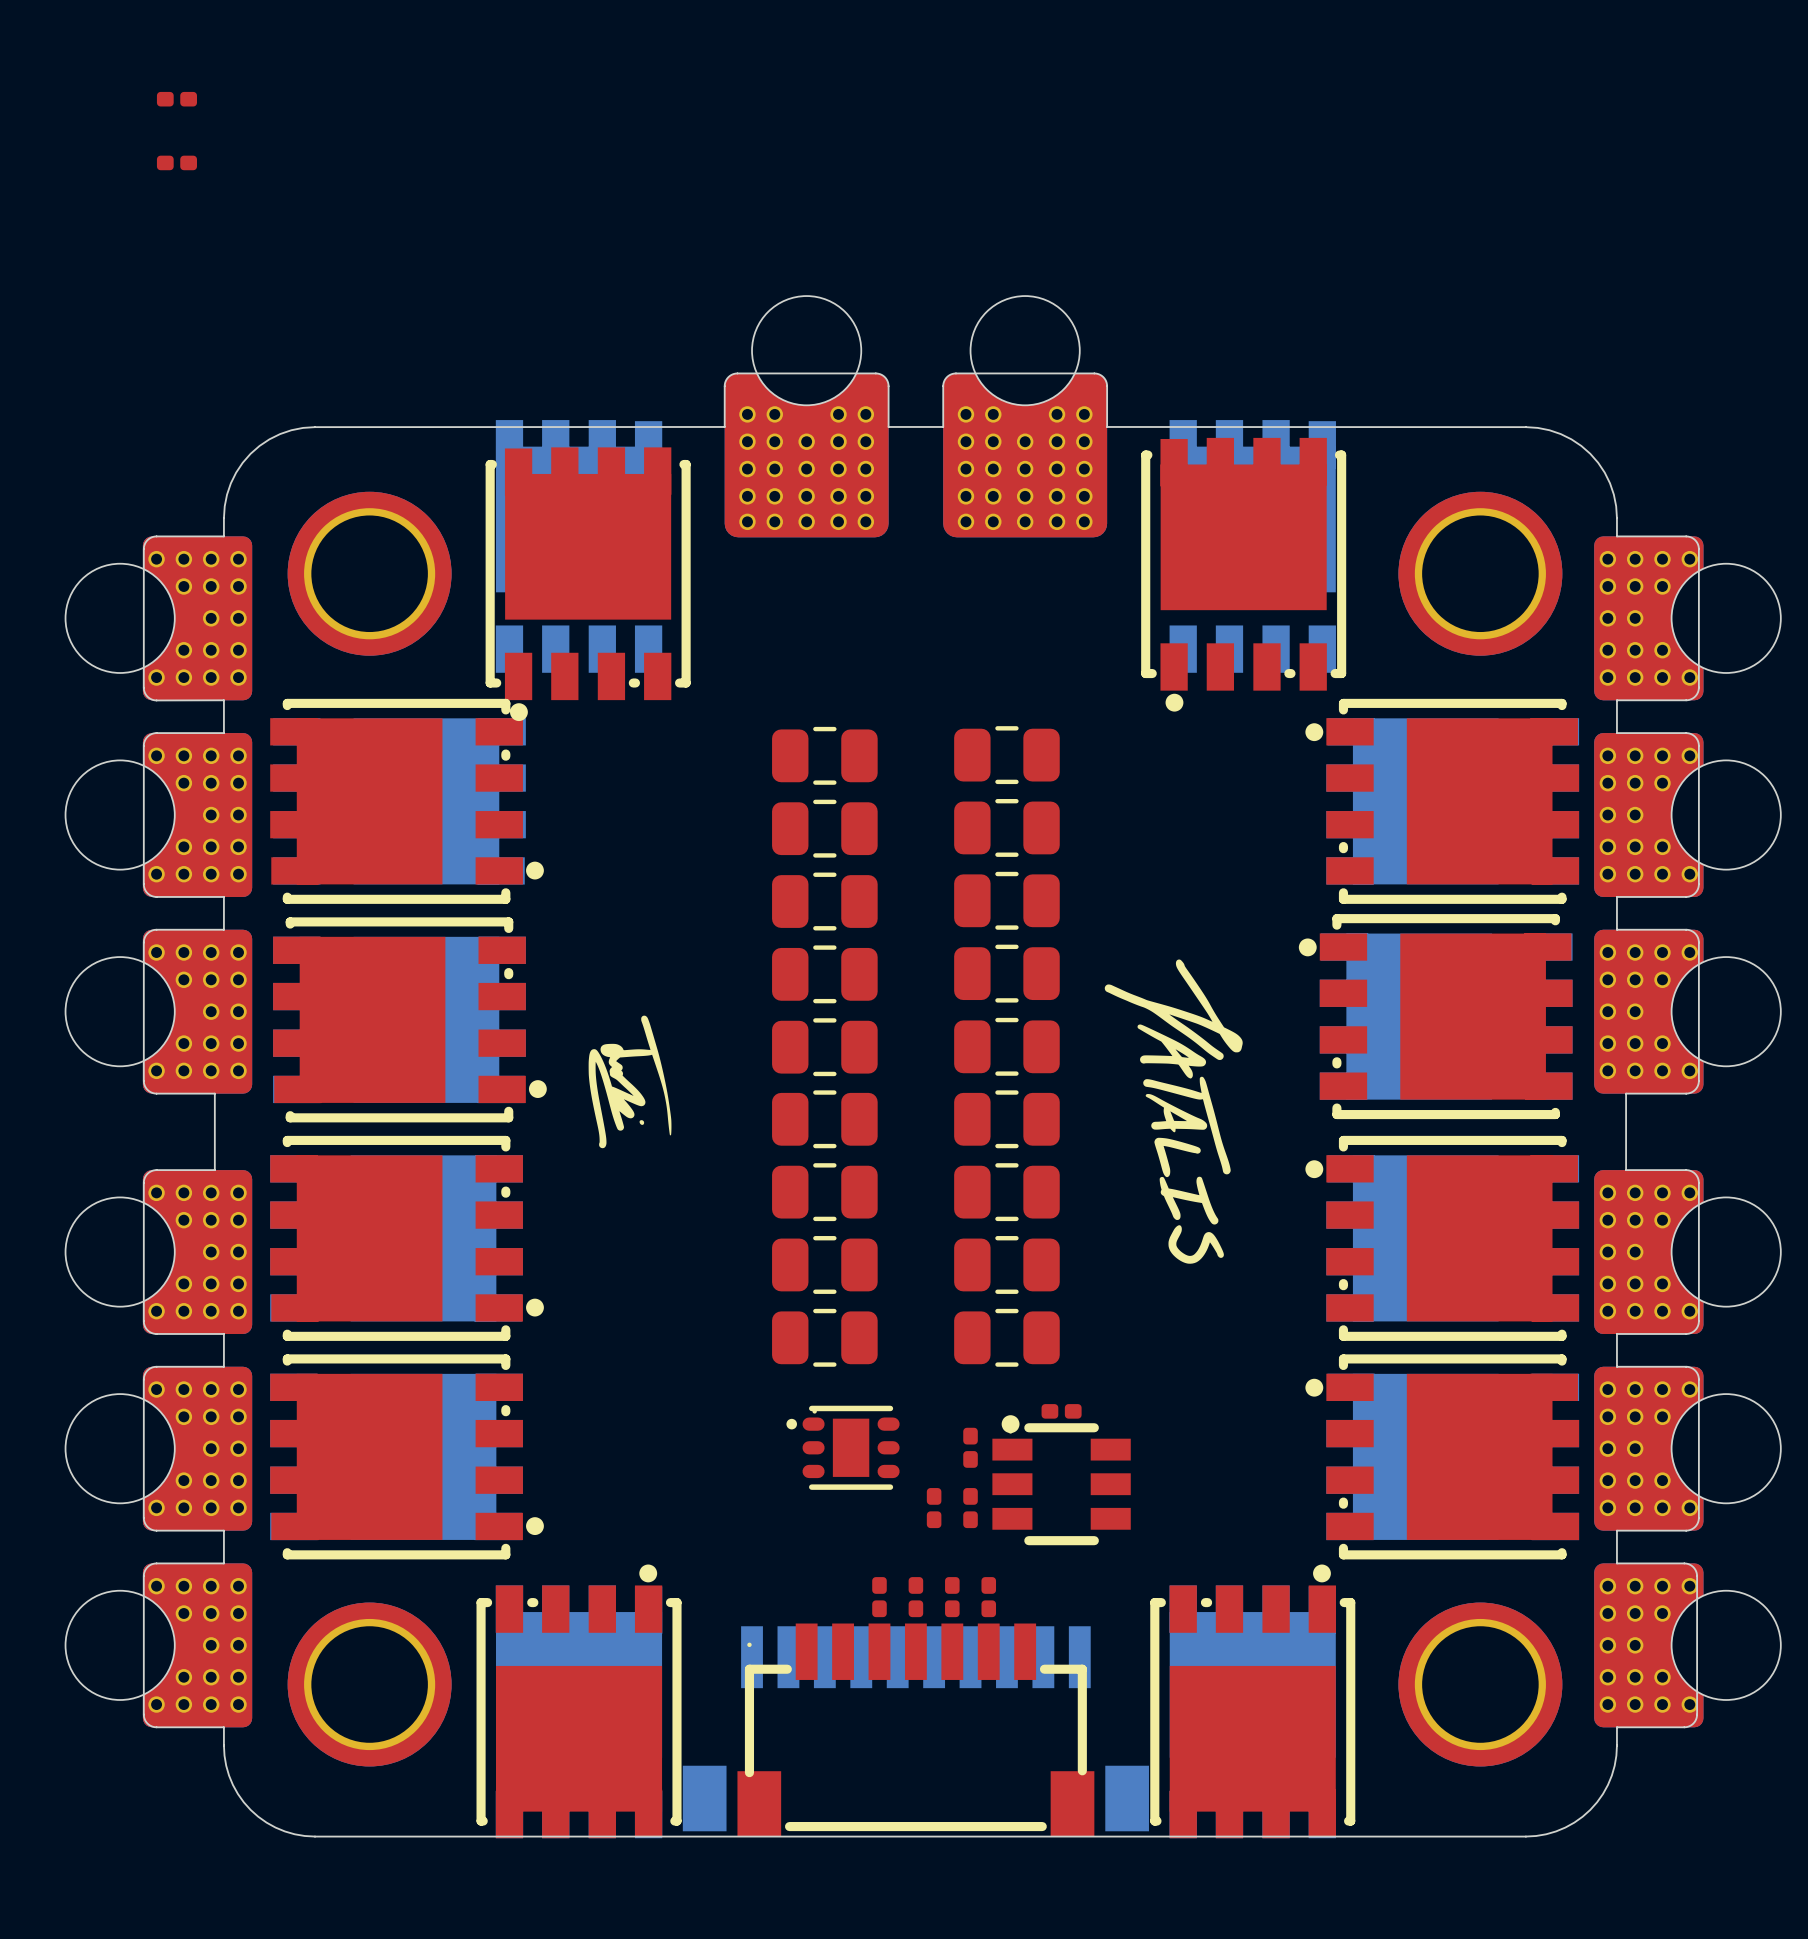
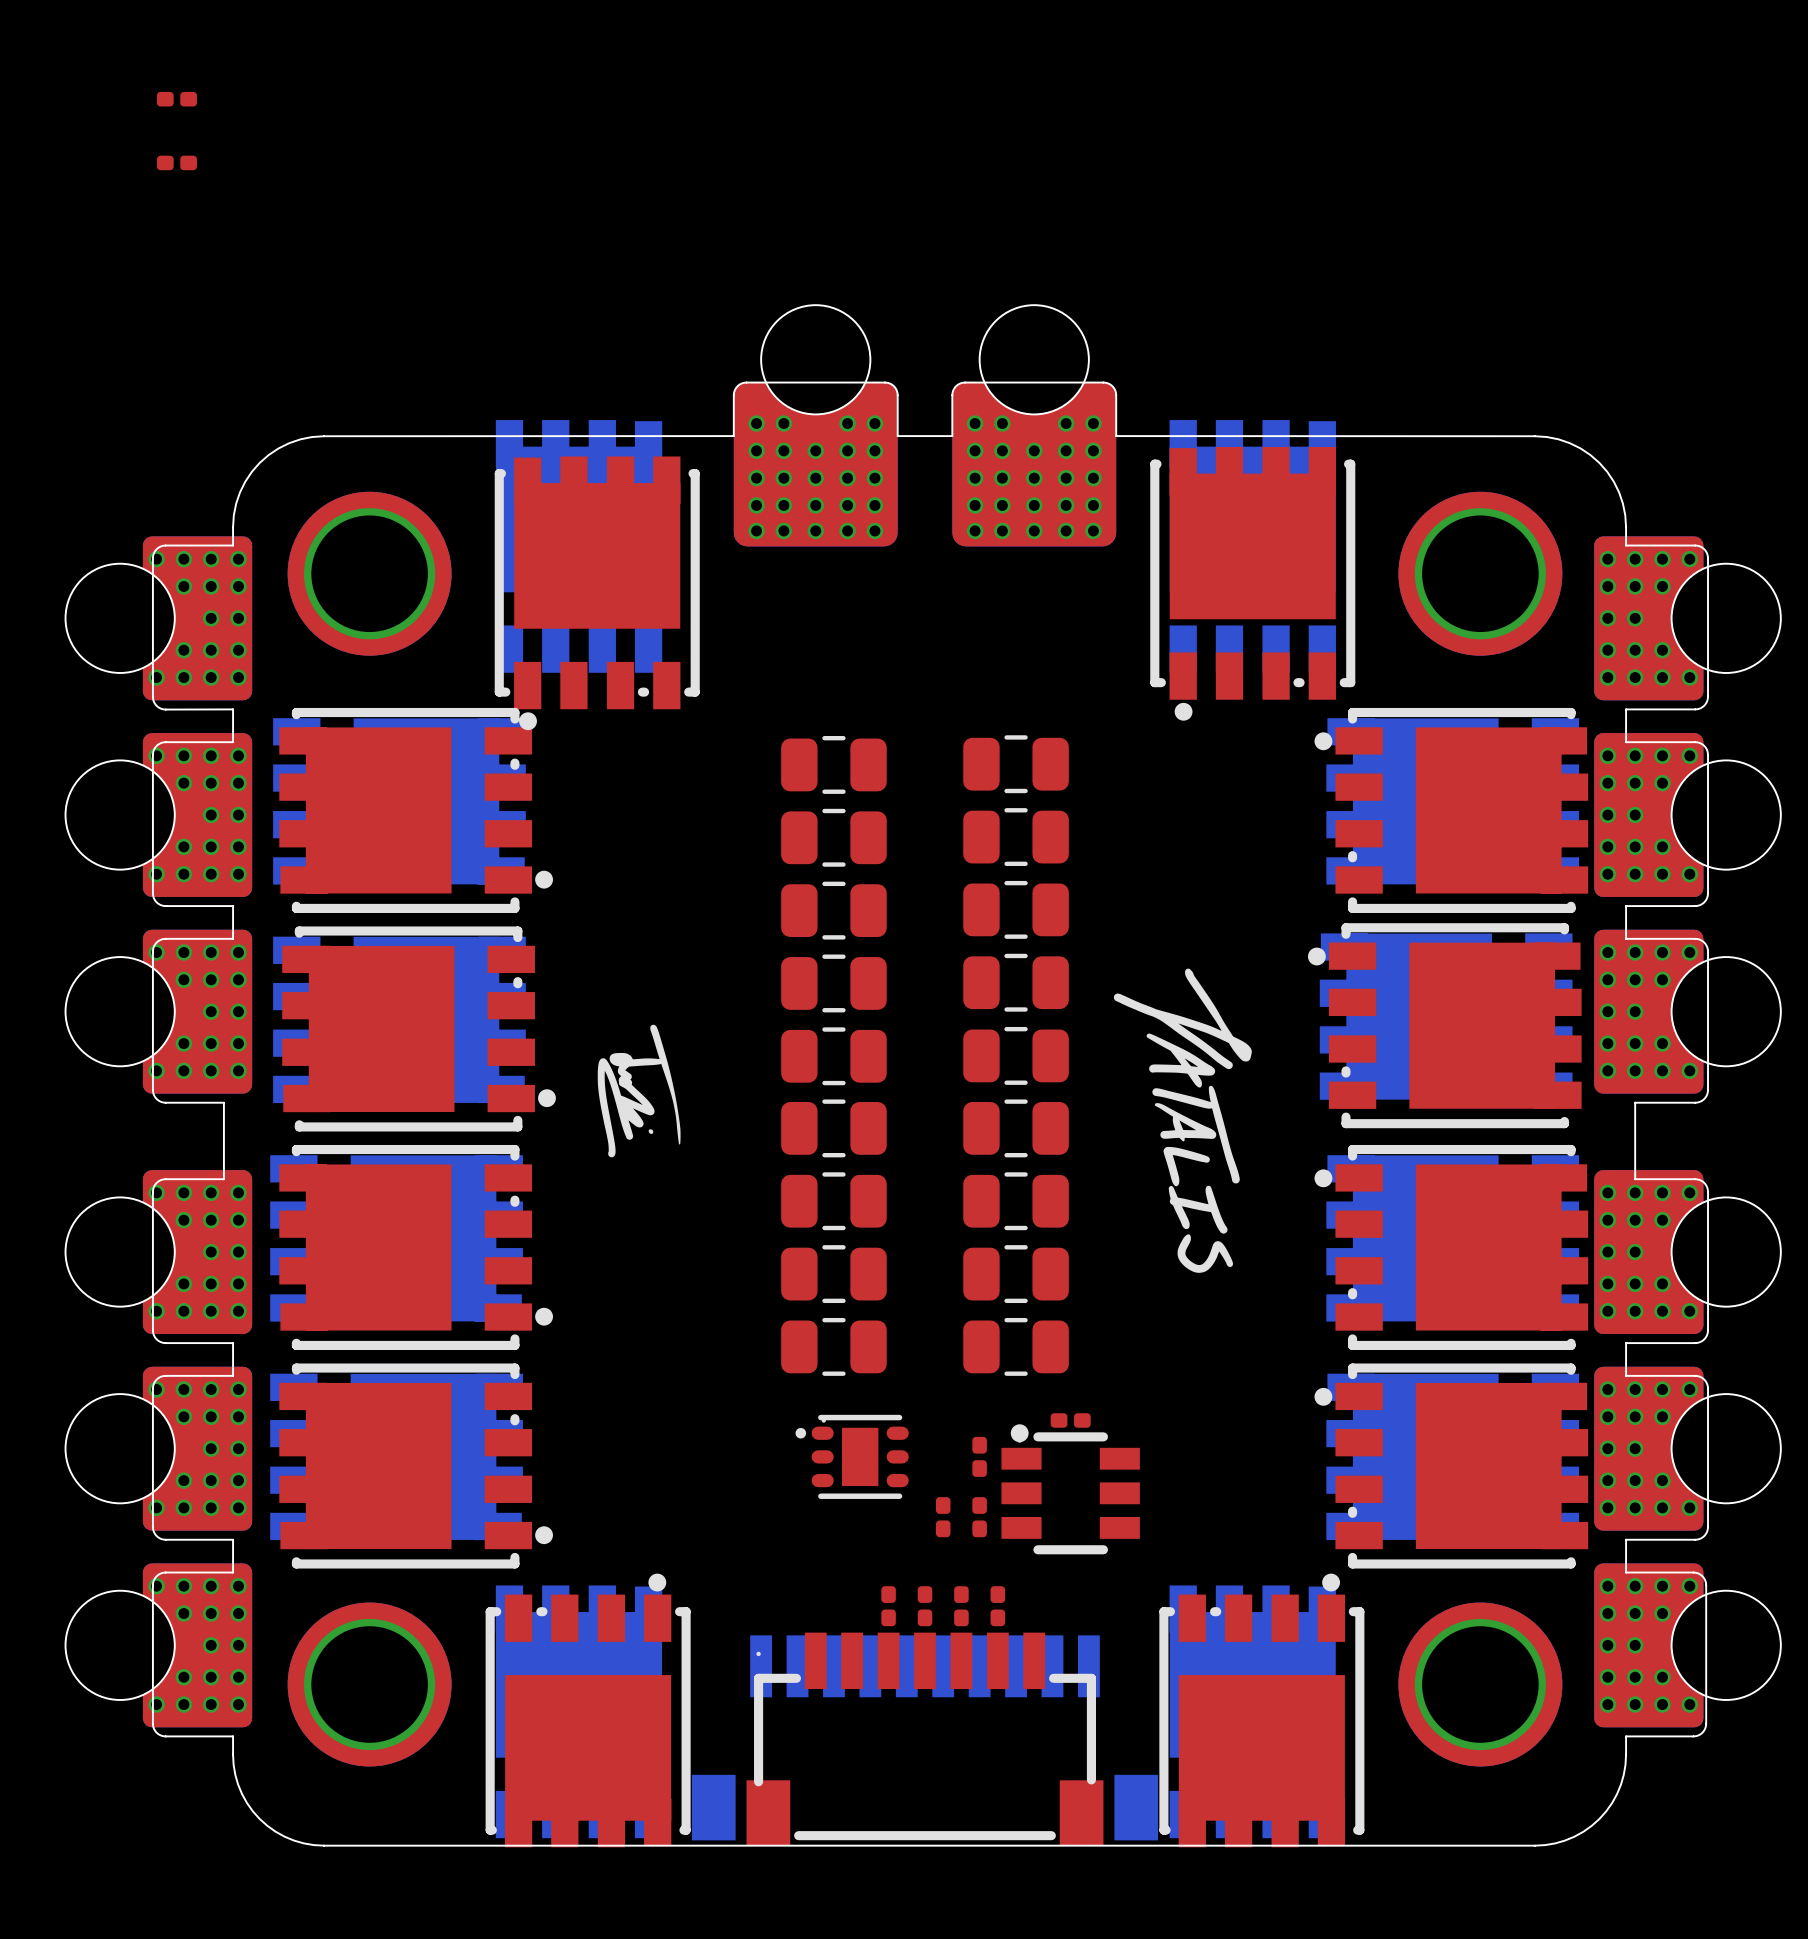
board edge: (737, 373) (880, 374) (885, 378) (888, 384) (888, 426) (943, 426) (943, 384) (946, 377) (952, 373) (1094, 373) (1102, 376) (1106, 382) (1107, 426) (1537, 427) (1549, 430) (1571, 439) (1590, 453) (1598, 462) (1604, 472) (1613, 494) (1616, 536) (1687, 536) (1697, 542) (1698, 549) (1698, 687) (1697, 693) (1687, 700) (1616, 700) (1616, 733) (1687, 733) (1695, 736) (1698, 744) (1698, 884) (1697, 890) (1687, 896) (1616, 896) (1616, 929) (1687, 929) (1695, 933) (1698, 940) (1697, 1085) (1693, 1090) (1687, 1093) (1626, 1093) (1626, 1170) (1687, 1170) (1695, 1173) (1698, 1179) (1698, 1324) (1693, 1331) (1687, 1333) (1616, 1333) (1616, 1366) (1687, 1366) (1695, 1370) (1698, 1376) (1698, 1517) (1697, 1524) (1687, 1530) (1616, 1530) (1616, 1563) (1686, 1563) (1692, 1566) (1696, 1571) (1696, 1716) (1693, 1723) (1686, 1727) (1616, 1727) (1616, 1755) (1607, 1785) (1590, 1809) (1574, 1822) (1555, 1831) (1525, 1836) (304, 1835) (284, 1831) (266, 1822) (243, 1802) (232, 1785) (226, 1765) (223, 1727) (154, 1727) (145, 1720) (143, 1714) (144, 1571) (148, 1566) (154, 1563) (223, 1563) (223, 1530) (154, 1530) (145, 1524) (143, 1517) (144, 1376) (147, 1370) (154, 1366) (223, 1366) (223, 1333) (154, 1333) (148, 1331) (144, 1324) (144, 1179) (147, 1173) (154, 1170) (214, 1170) (214, 1093) (154, 1093) (148, 1090) (144, 1085) (143, 940) (147, 933) (154, 929) (223, 929) (223, 896) (154, 896) (145, 890) (143, 884) (143, 744) (147, 736) (154, 733) (223, 733) (223, 700) (155, 700) (149, 698) (145, 693) (144, 544) (148, 539) (154, 536) (223, 536) (224, 506) (230, 483) (236, 472) (242, 462) (259, 445) (280, 434) (291, 430) (314, 427) (724, 426) (725, 382) (729, 376) (737, 373) -> (746, 382) (889, 383) (895, 387) (897, 393) (897, 436) (952, 436) (952, 393) (954, 387) (961, 382) (1103, 382) (1111, 385) (1115, 391) (1116, 436) (1546, 437) (1569, 443) (1580, 448) (1590, 455) (1607, 471) (1619, 492) (1622, 503) (1626, 545) (1696, 545) (1706, 551) (1708, 558) (1708, 696) (1706, 703) (1696, 709) (1626, 709) (1626, 742) (1696, 742) (1704, 745) (1707, 753) (1708, 893) (1706, 899) (1696, 905) (1626, 906) (1626, 938) (1696, 938) (1704, 942) (1707, 949) (1707, 1094) (1703, 1100) (1696, 1102) (1635, 1102) (1635, 1179) (1696, 1179) (1704, 1182) (1707, 1188) (1707, 1333) (1704, 1339) (1696, 1342) (1626, 1343) (1626, 1375) (1696, 1375) (1703, 1378) (1707, 1385) (1708, 1527) (1706, 1533) (1696, 1539) (1626, 1539) (1626, 1572) (1695, 1572) (1701, 1575) (1705, 1580) (1706, 1725) (1702, 1732) (1695, 1736) (1626, 1736) (1625, 1764) (1617, 1794) (1606, 1811) (1583, 1831) (1555, 1843) (1535, 1845) (313, 1845) (284, 1836) (267, 1825) (252, 1811) (242, 1794) (235, 1774) (233, 1736) (164, 1736) (154, 1730) (152, 1723) (153, 1580) (157, 1575) (164, 1572) (233, 1572) (233, 1539) (164, 1539) (154, 1533) (152, 1527) (153, 1385) (156, 1379) (164, 1375) (233, 1375) (233, 1343) (164, 1342) (156, 1339) (153, 1333) (153, 1188) (157, 1181) (164, 1179) (223, 1179) (223, 1102) (164, 1102) (157, 1100) (153, 1094) (153, 949) (156, 942) (164, 938) (233, 938) (233, 906) (164, 905) (154, 899) (152, 893) (153, 753) (156, 745) (164, 742) (233, 742) (233, 709) (164, 709) (157, 706) (154, 702) (153, 553) (157, 548) (164, 545) (233, 545) (233, 515) (239, 492) (245, 481) (259, 462) (268, 455) (278, 448) (300, 439) (324, 436) (733, 436) (734, 391) (738, 385) (746, 382)
part position: (915, 416) -> (925, 425)
part position: (1243, 574) -> (1252, 583)
part position: (588, 584) -> (597, 593)
part position: (824, 755) -> (833, 764)
part position: (1006, 755) -> (1016, 764)
part position: (407, 801) -> (416, 810)
part position: (1442, 801) -> (1451, 810)
part position: (1006, 827) -> (1016, 837)
part position: (824, 828) -> (833, 837)
part position: (1006, 900) -> (1016, 909)
part position: (824, 901) -> (833, 910)
part position: (1006, 973) -> (1016, 982)
part position: (824, 974) -> (833, 983)
part position: (1435, 1016) -> (1444, 1025)
part position: (409, 1019) -> (419, 1028)
part position: (1006, 1046) -> (1016, 1055)
part position: (824, 1047) -> (833, 1056)
drawing position: (630, 1081) -> (639, 1091)
drawing position: (1173, 1111) -> (1182, 1120)
part position: (824, 1119) -> (833, 1128)
part position: (1006, 1119) -> (1016, 1128)
part position: (824, 1192) -> (833, 1201)
part position: (1006, 1192) -> (1016, 1201)
part position: (407, 1238) -> (416, 1247)
part position: (1442, 1238) -> (1451, 1247)
part position: (824, 1264) -> (833, 1274)
part position: (1006, 1264) -> (1016, 1274)
part position: (824, 1337) -> (833, 1346)
part position: (1006, 1337) -> (1016, 1346)
part position: (1061, 1411) -> (1070, 1420)
part position: (843, 1447) -> (852, 1456)
part position: (970, 1447) -> (979, 1456)
part position: (407, 1456) -> (416, 1466)
part position: (1442, 1456) -> (1451, 1466)
part position: (1061, 1480) -> (1070, 1489)
part position: (934, 1508) -> (943, 1517)
part position: (970, 1508) -> (979, 1517)
part position: (879, 1597) -> (888, 1606)
part position: (915, 1597) -> (925, 1606)
part position: (952, 1597) -> (961, 1606)
part position: (988, 1597) -> (997, 1606)
part position: (579, 1701) -> (588, 1710)
part position: (1252, 1701) -> (1261, 1710)
part position: (915, 1728) -> (925, 1737)
part position: (915, 1730) -> (925, 1739)

